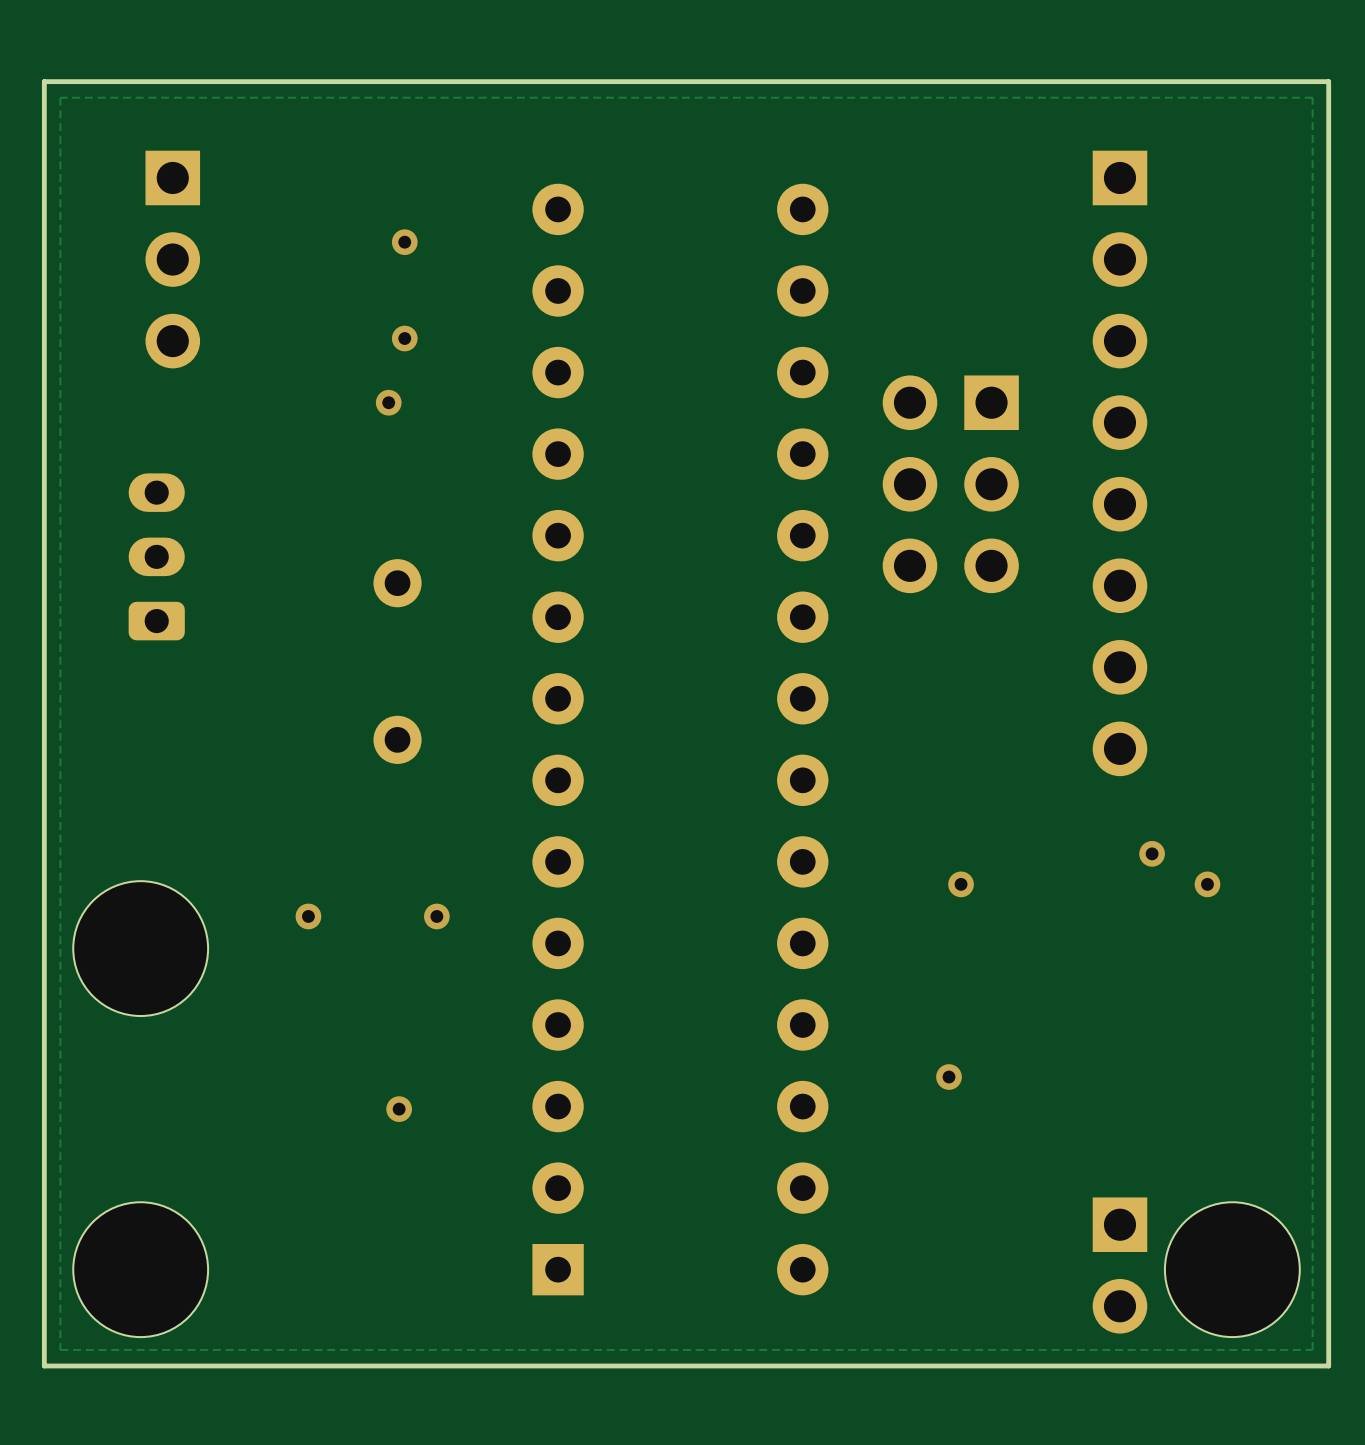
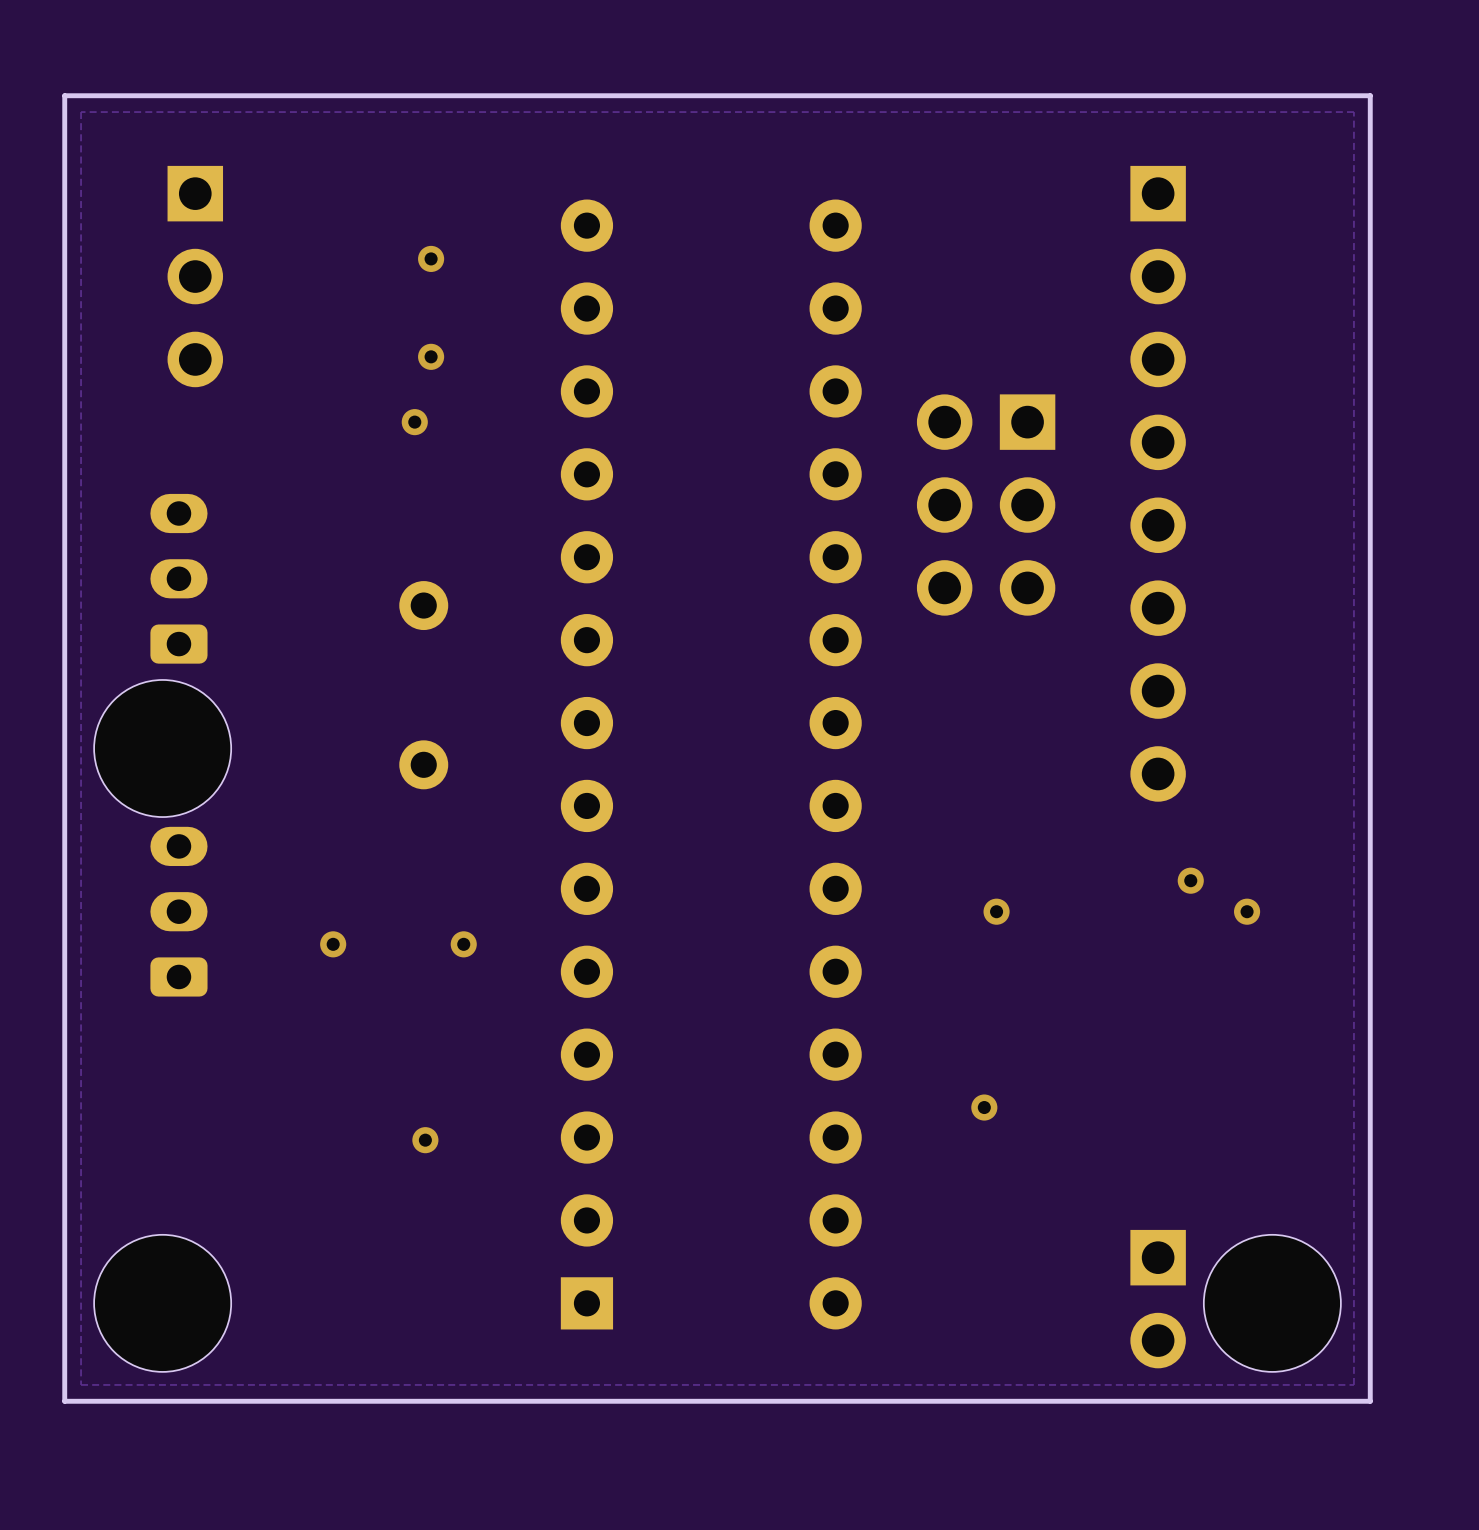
part: none -> (178, 911)
part position: (140, 948) -> (162, 748)

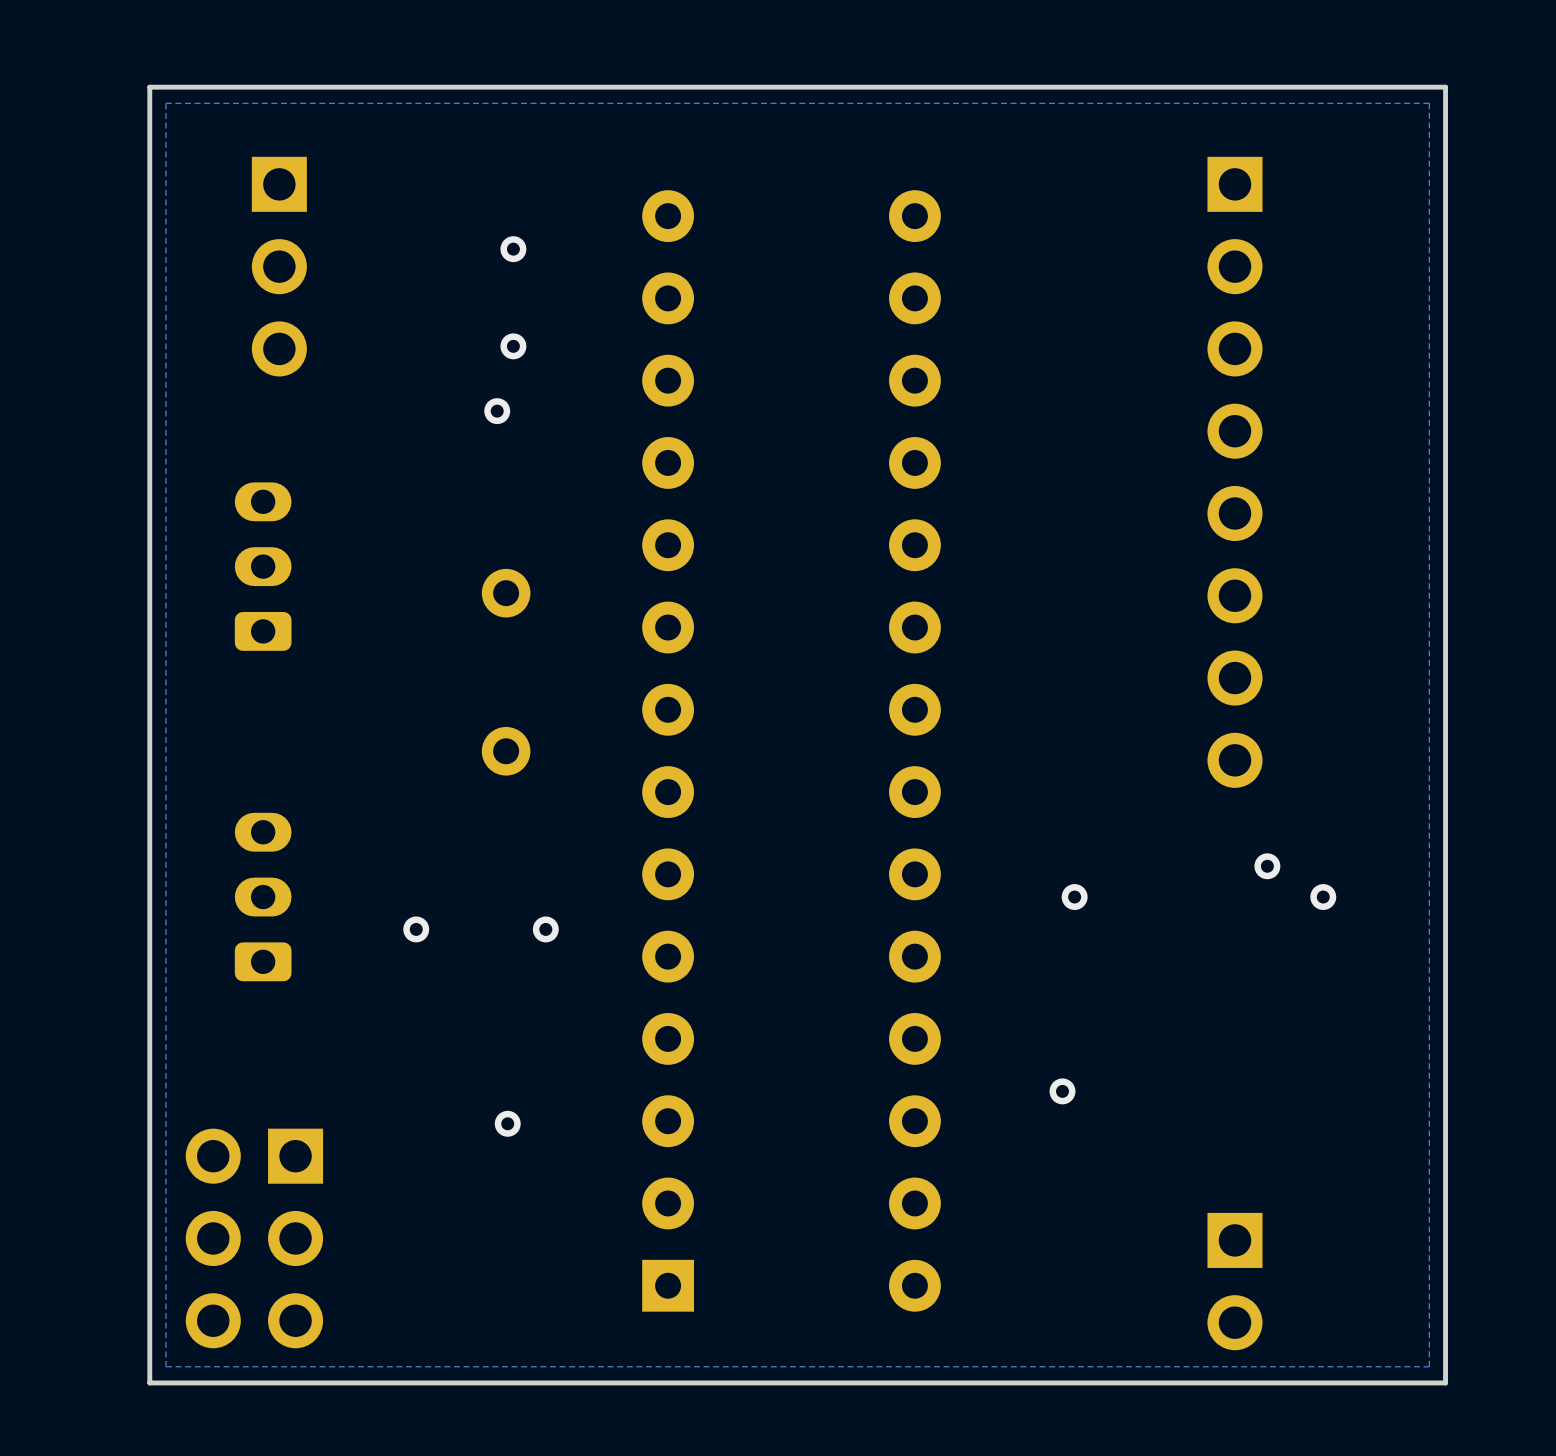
part: (986, 505) -> none
part: (162, 748) -> none
part: none -> (254, 1238)
part: (162, 1303) -> none
part: (1272, 1303) -> none

